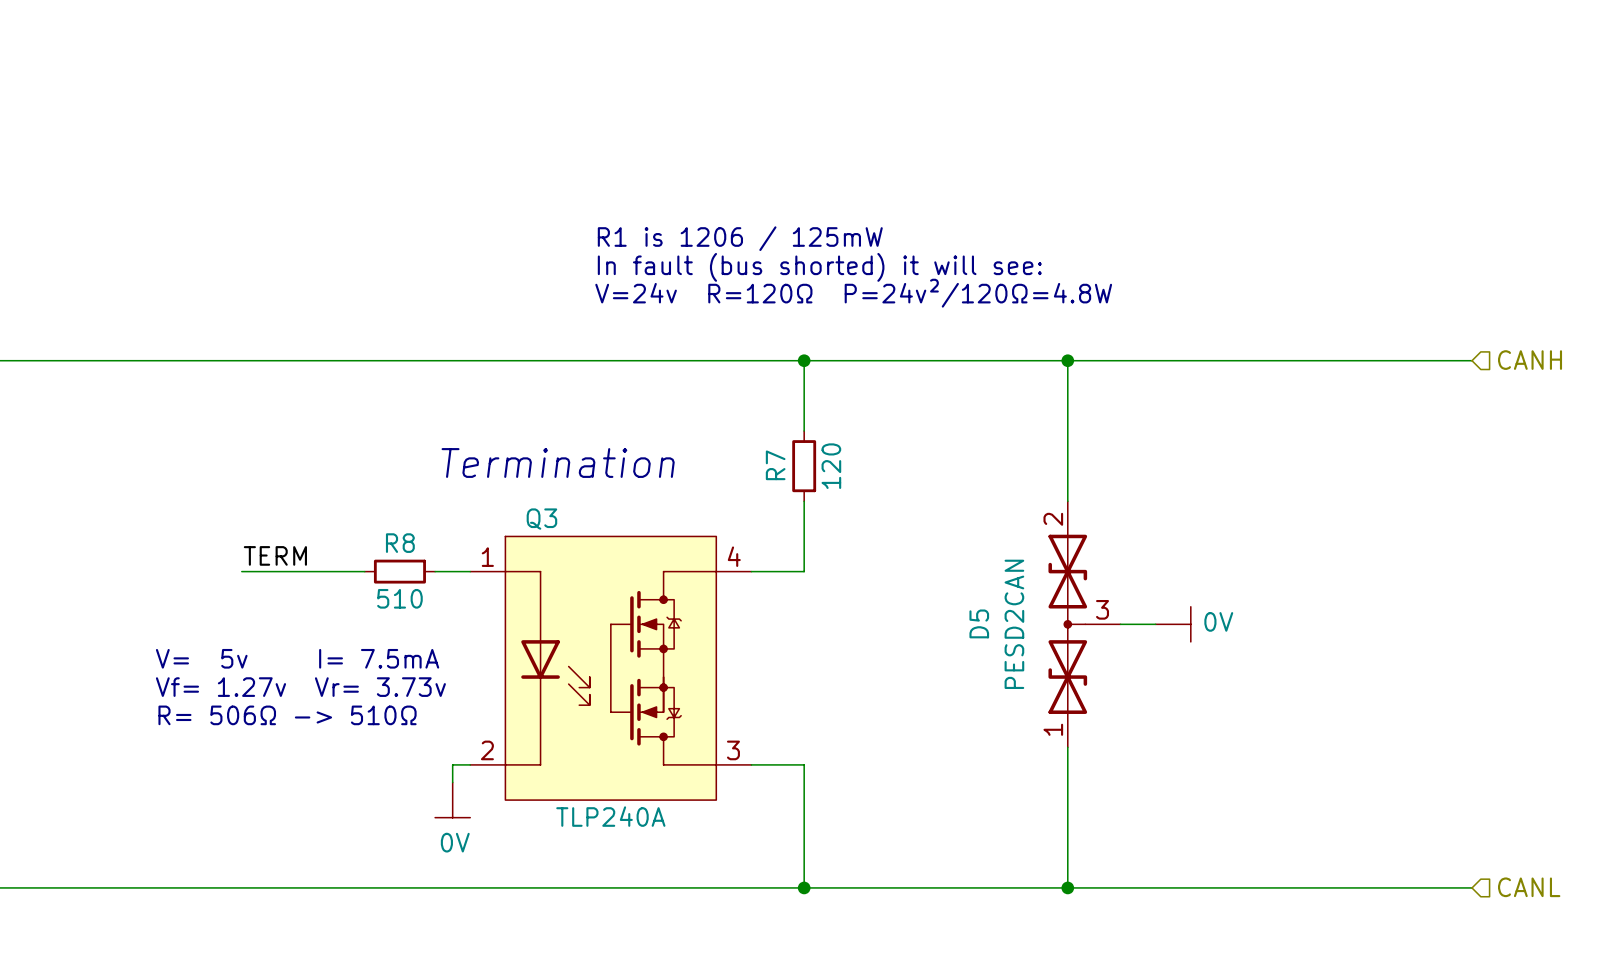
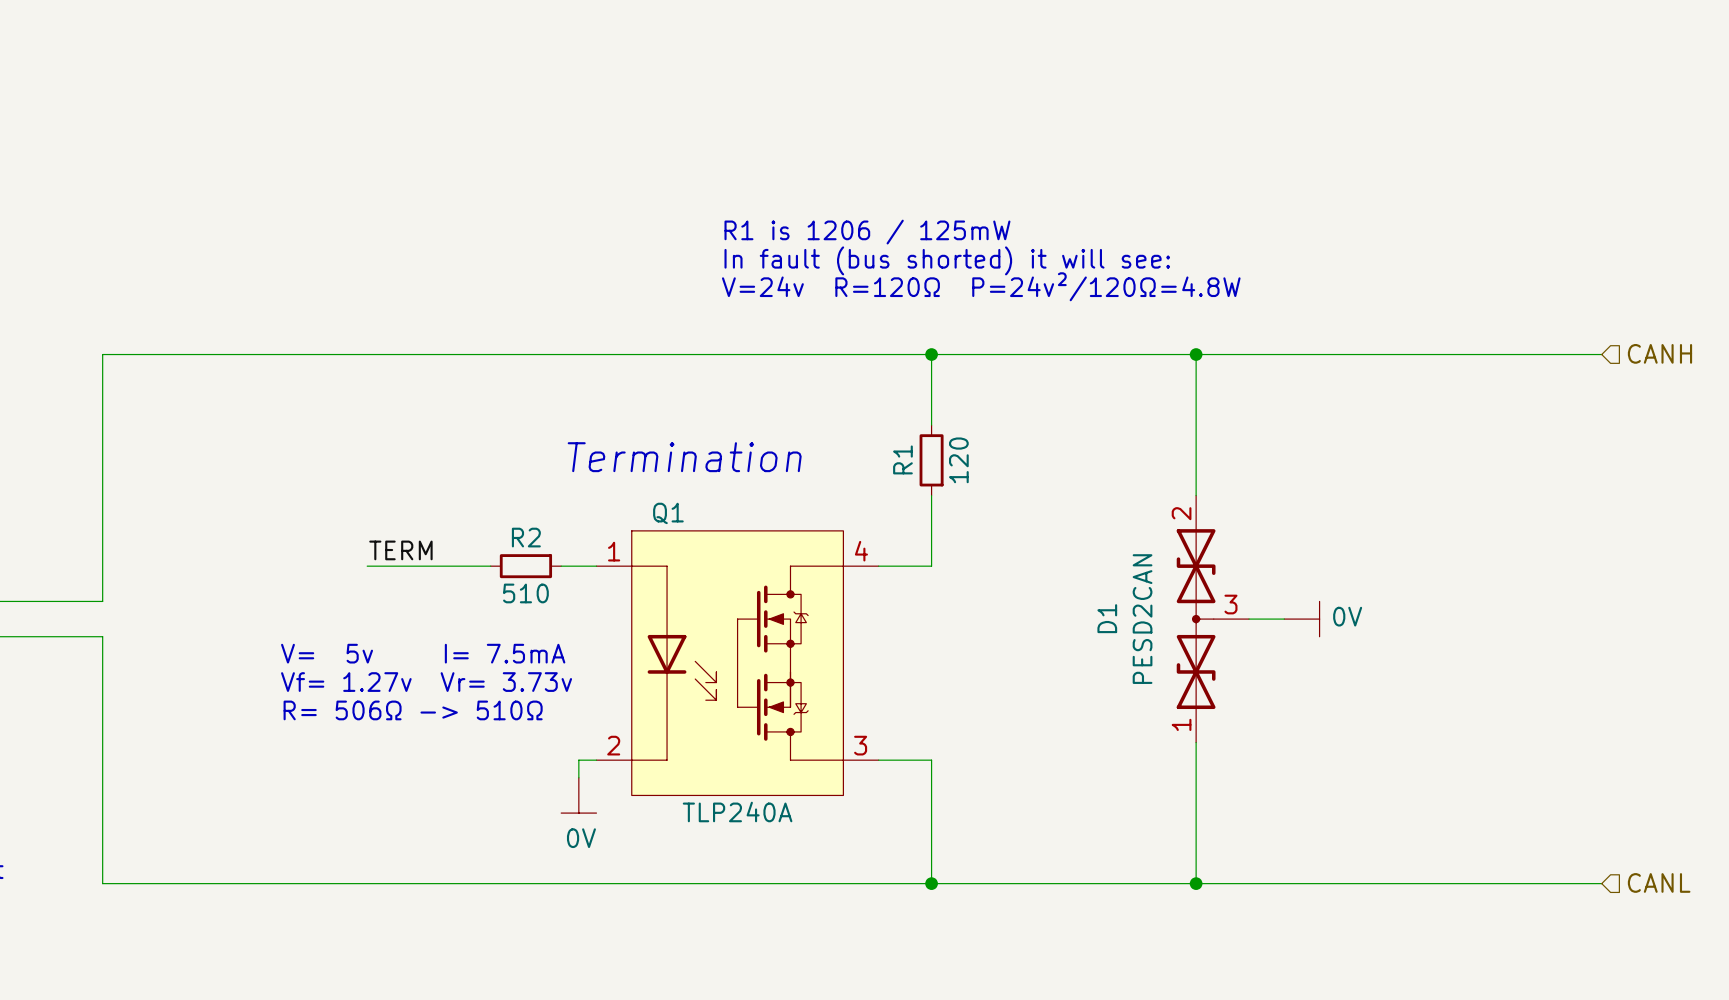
R7 name: R7 (775, 465) -> R1 (902, 459)
Q3 name: Q3 (541, 519) -> Q1 (668, 513)
R8 name: R8 (400, 543) -> R2 (526, 537)
D5 name: D5 (979, 623) -> D1 (1107, 618)

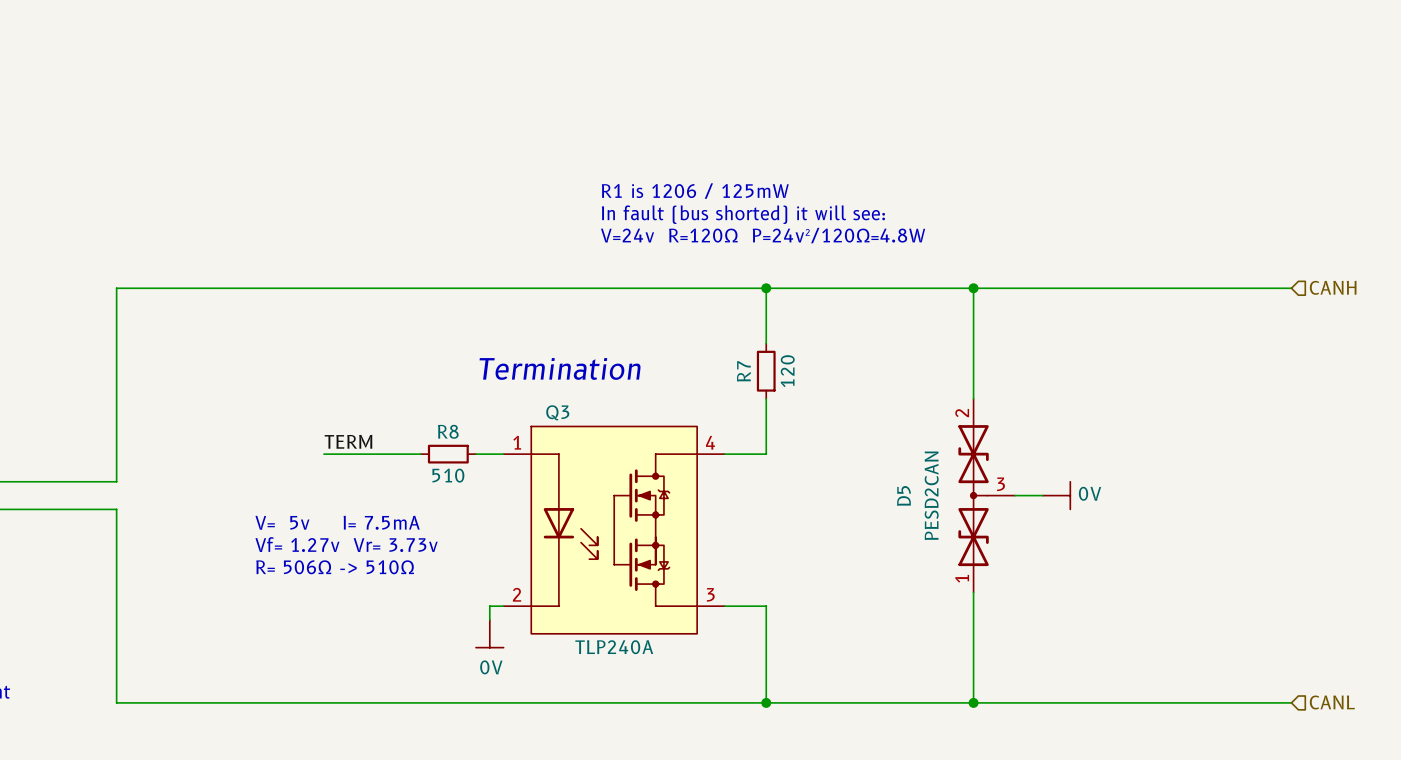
R1 name: R1 (902, 459) -> R7 (743, 371)
Q1 name: Q1 (668, 513) -> Q3 (557, 412)
R2 name: R2 (526, 537) -> R8 (448, 431)
D1 name: D1 (1107, 618) -> D5 (903, 495)

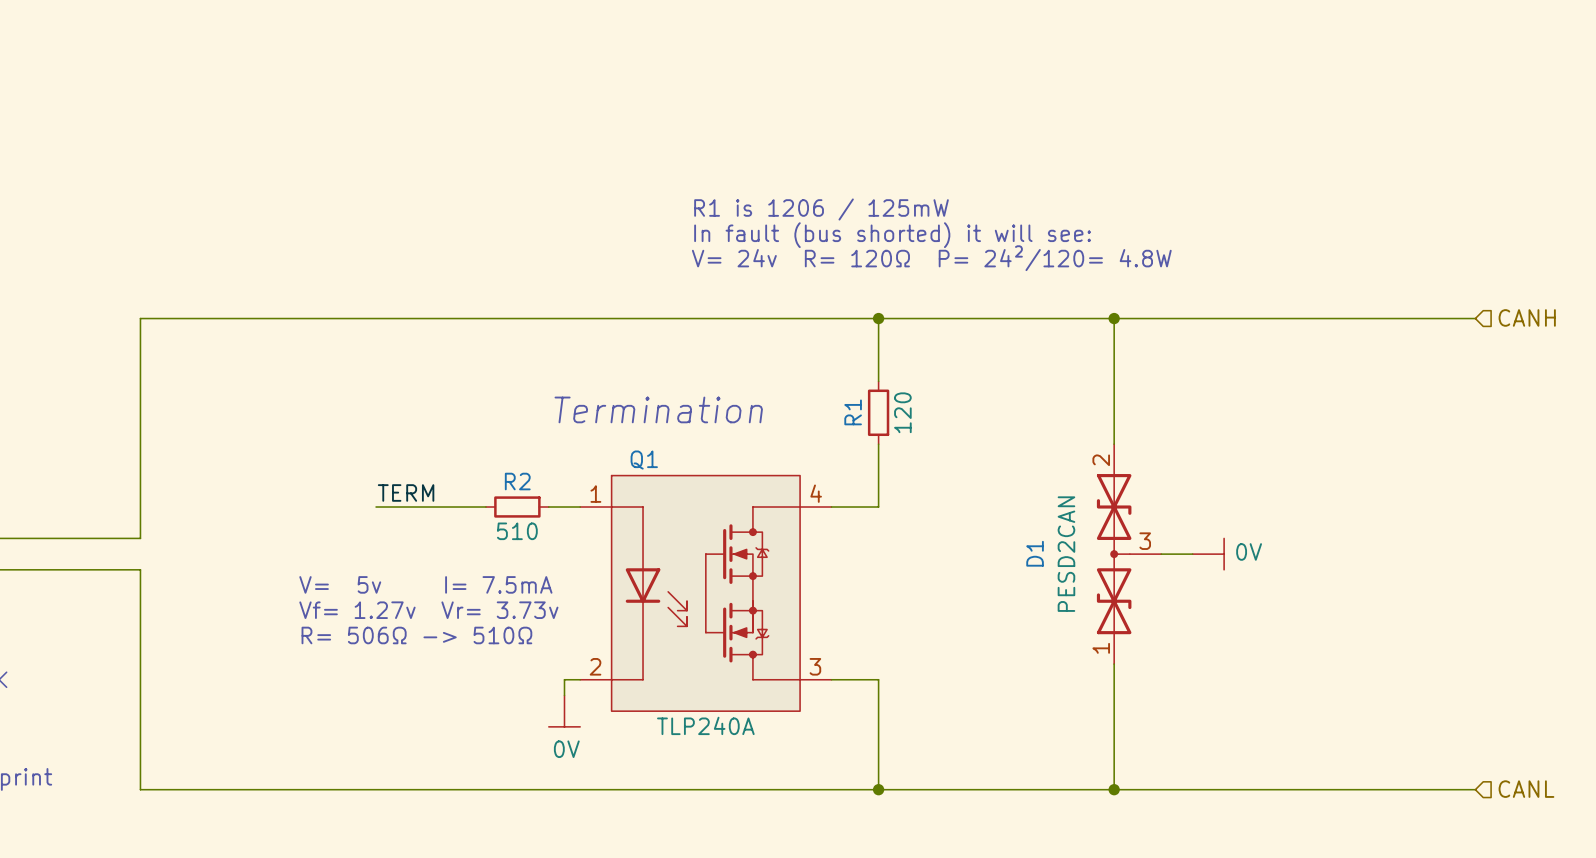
text: V=24v R=120Ω P=24v²/120Ω=4.8W (763, 235) -> V= 24v R= 120Ω P= 24²/120= 4.8W (931, 258)
R7 name: R7 (743, 371) -> R1 (853, 412)
Q3 name: Q3 (557, 412) -> Q1 (644, 460)
R8 name: R8 (448, 431) -> R2 (517, 481)
D5 name: D5 (903, 495) -> D1 (1035, 553)

